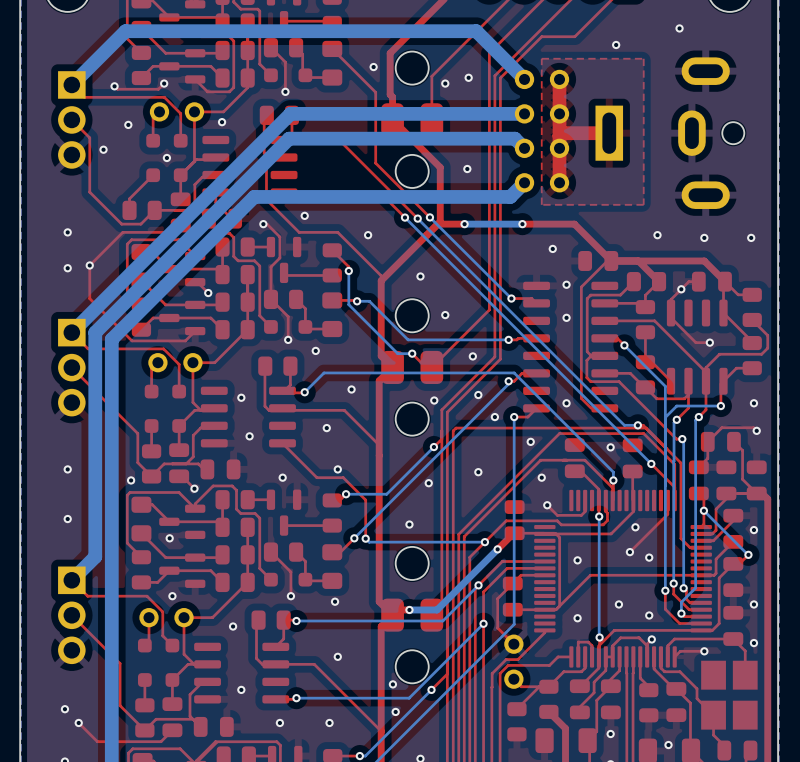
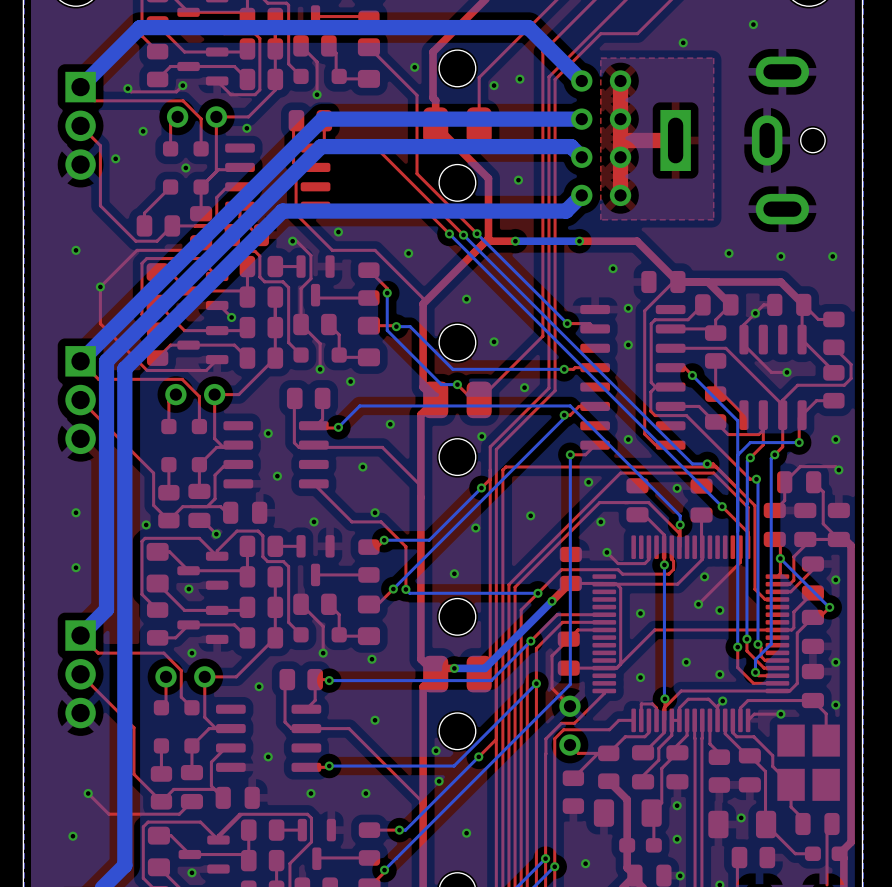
via: (67, 268) -> none
via: (478, 395) -> none
via: (494, 417) -> none
via: (64, 709) -> none

